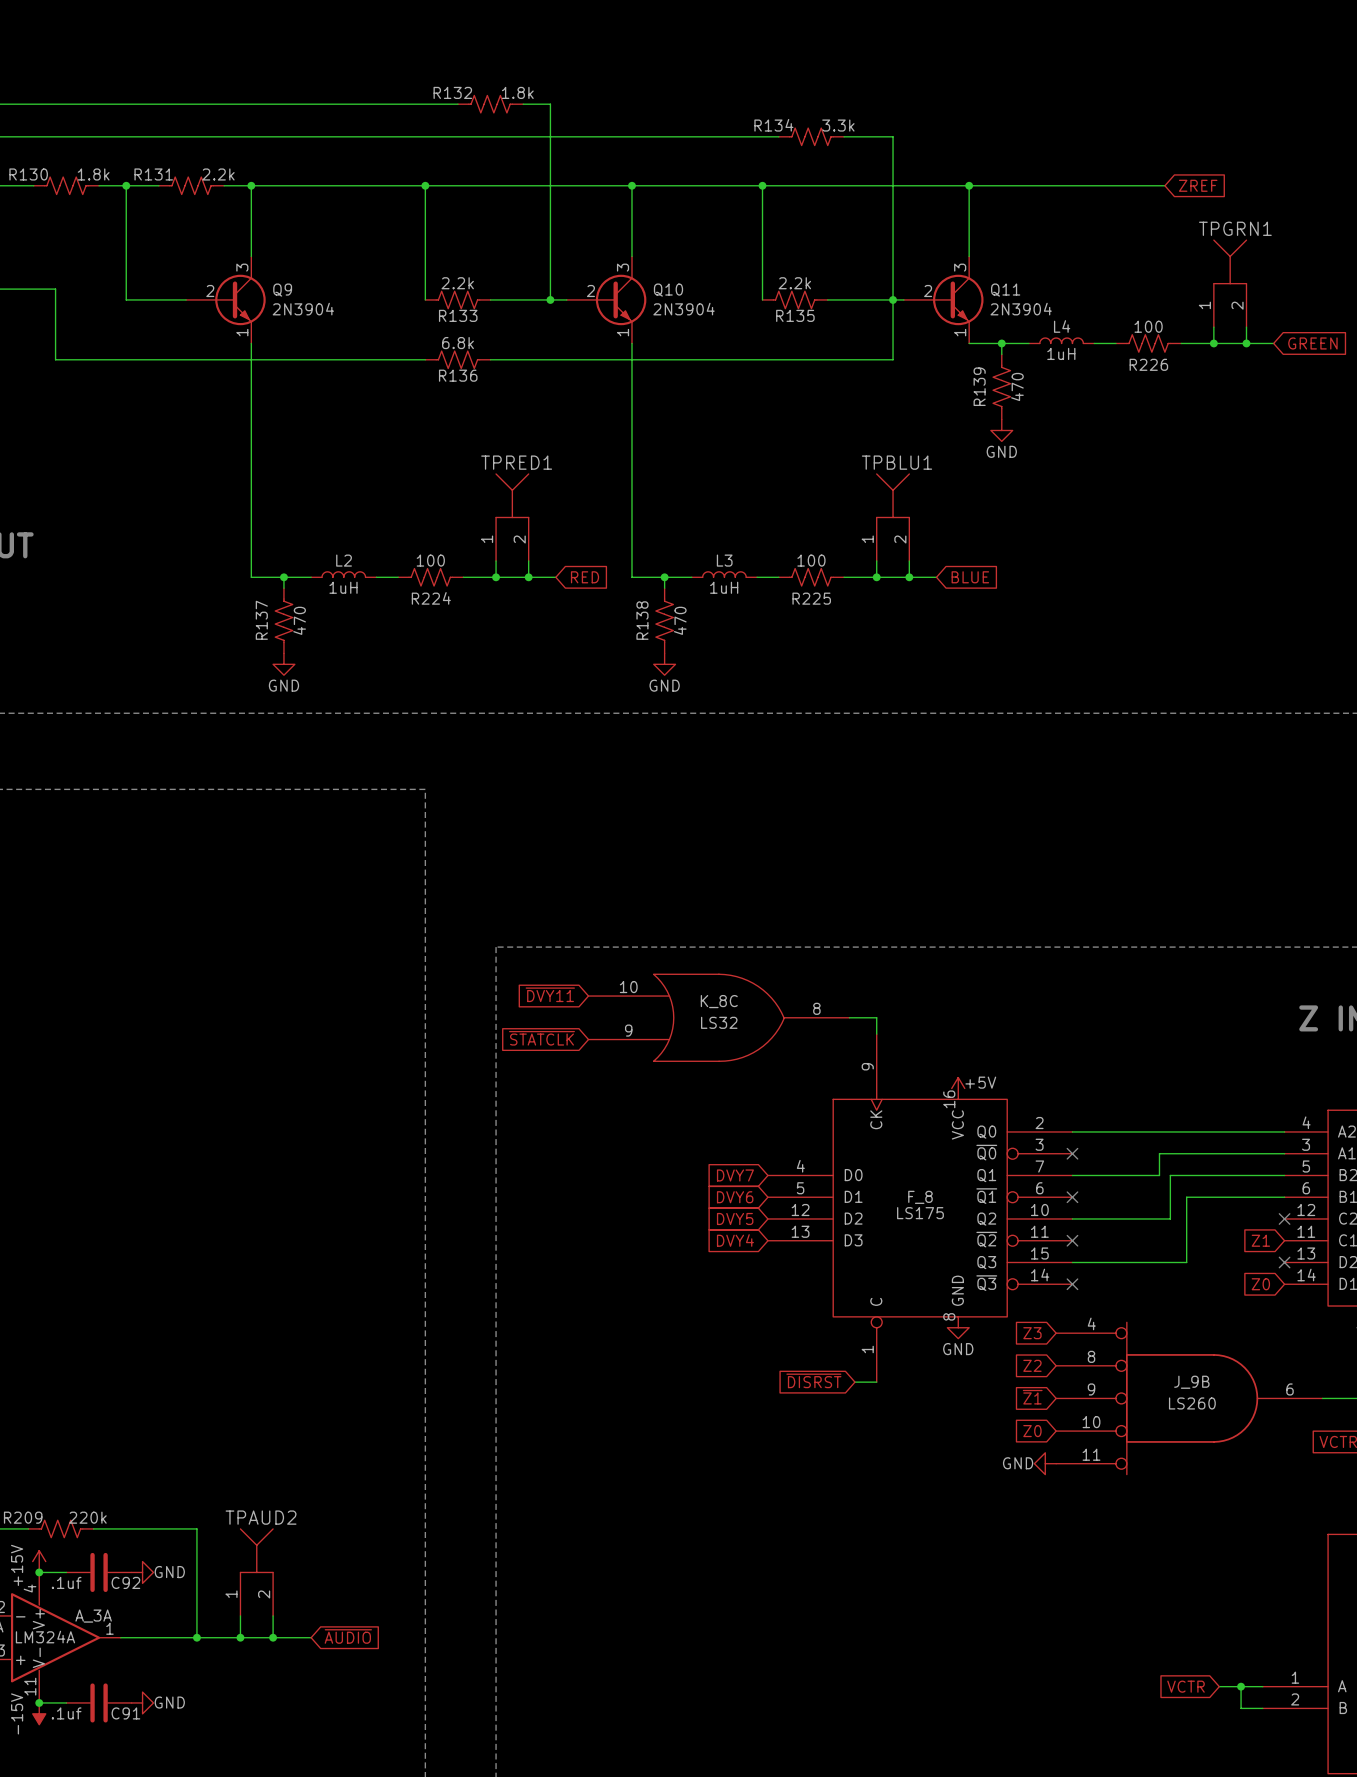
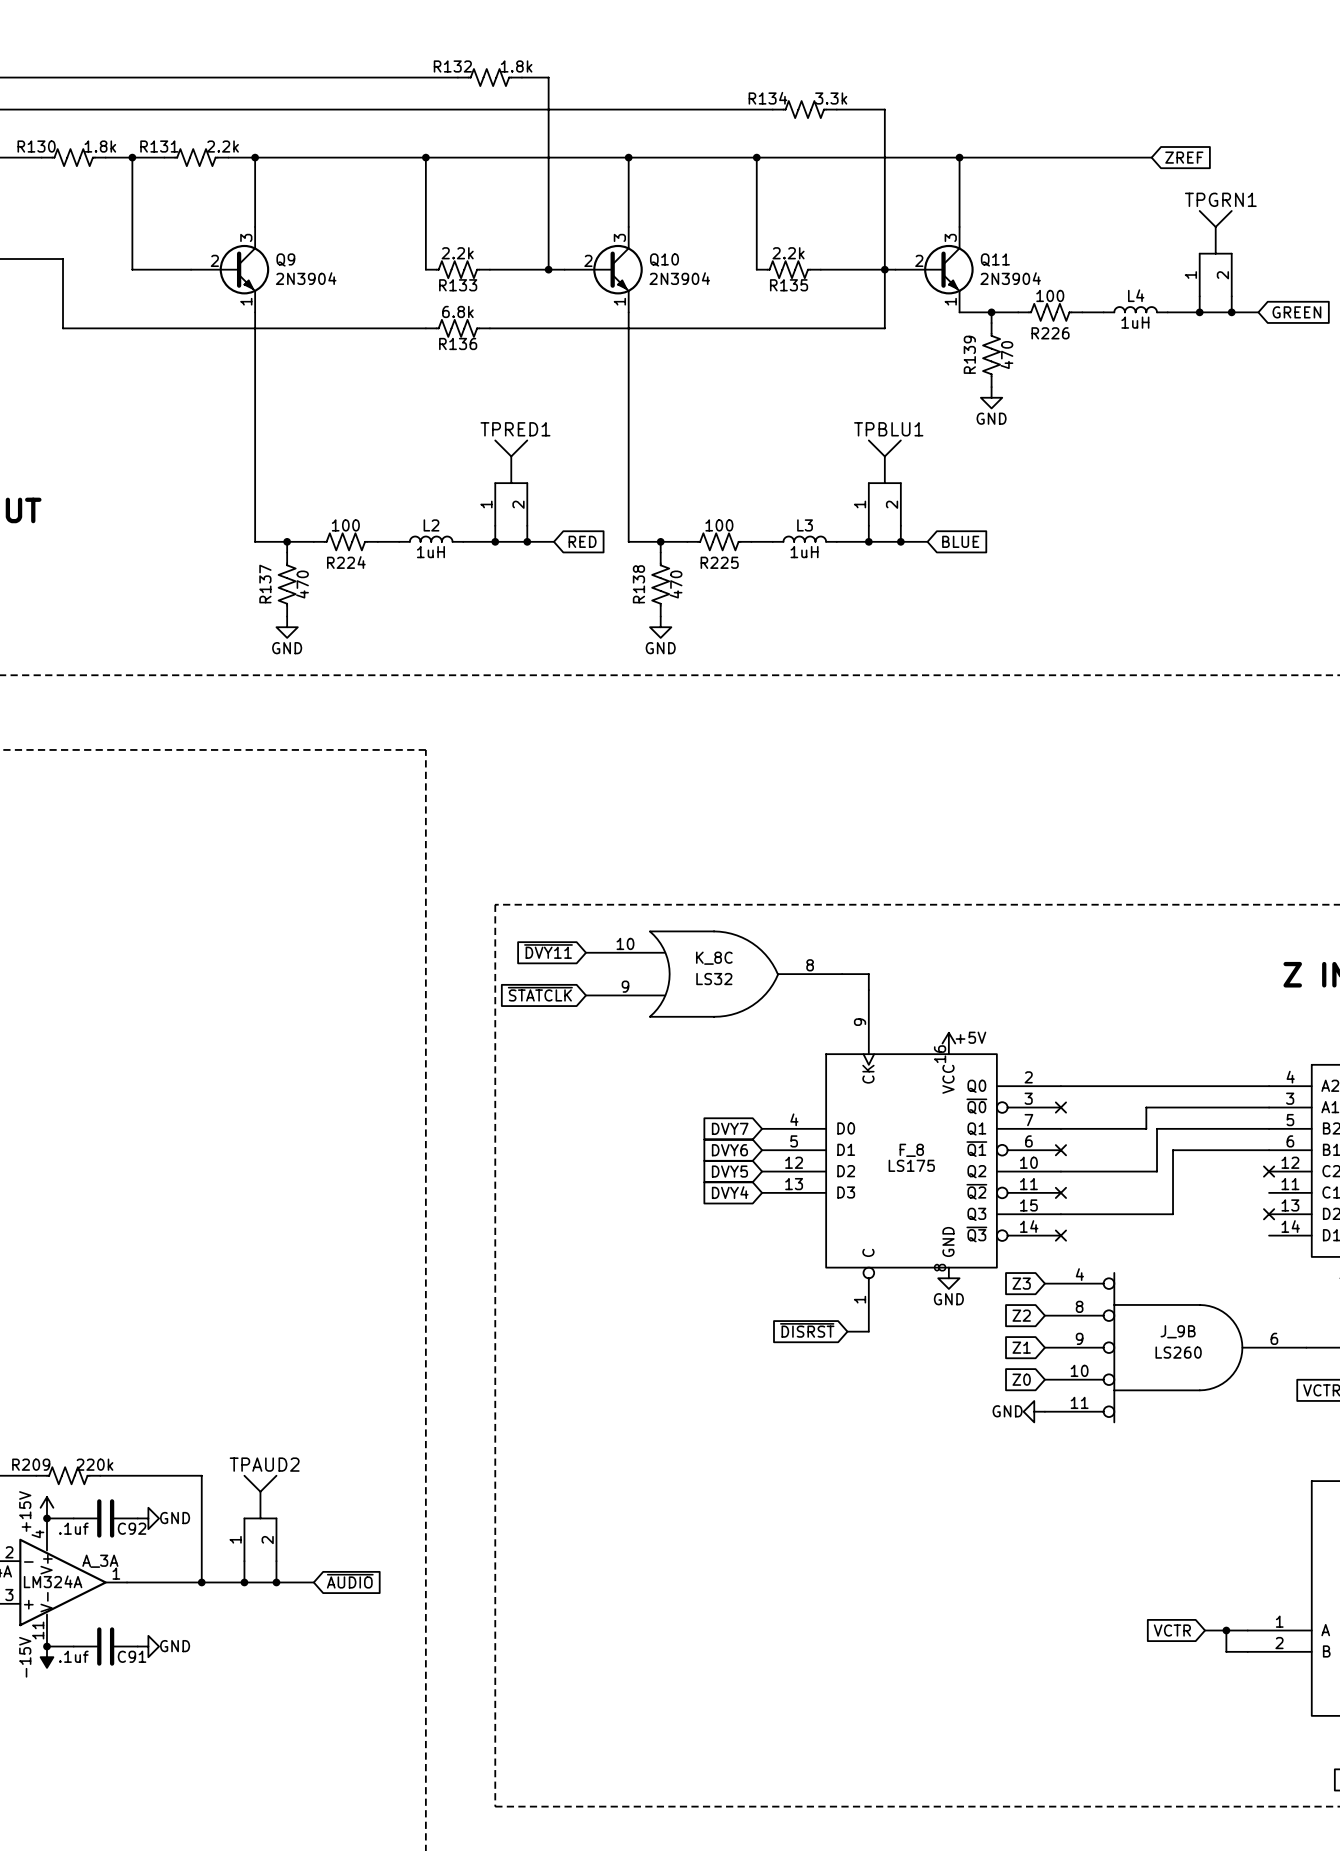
L4 position: (1061, 340) -> (1135, 309)
R226 position: (1148, 343) -> (1050, 312)
L2 position: (343, 574) -> (431, 539)
L3 position: (724, 574) -> (804, 539)
R224 position: (430, 577) -> (345, 541)
R225 position: (811, 577) -> (719, 541)
global label: Z1 (1260, 1240) -> none
global label: Z0 (1260, 1284) -> none
global label: ~{Z1} (1032, 1397) -> Z1 (1021, 1347)

